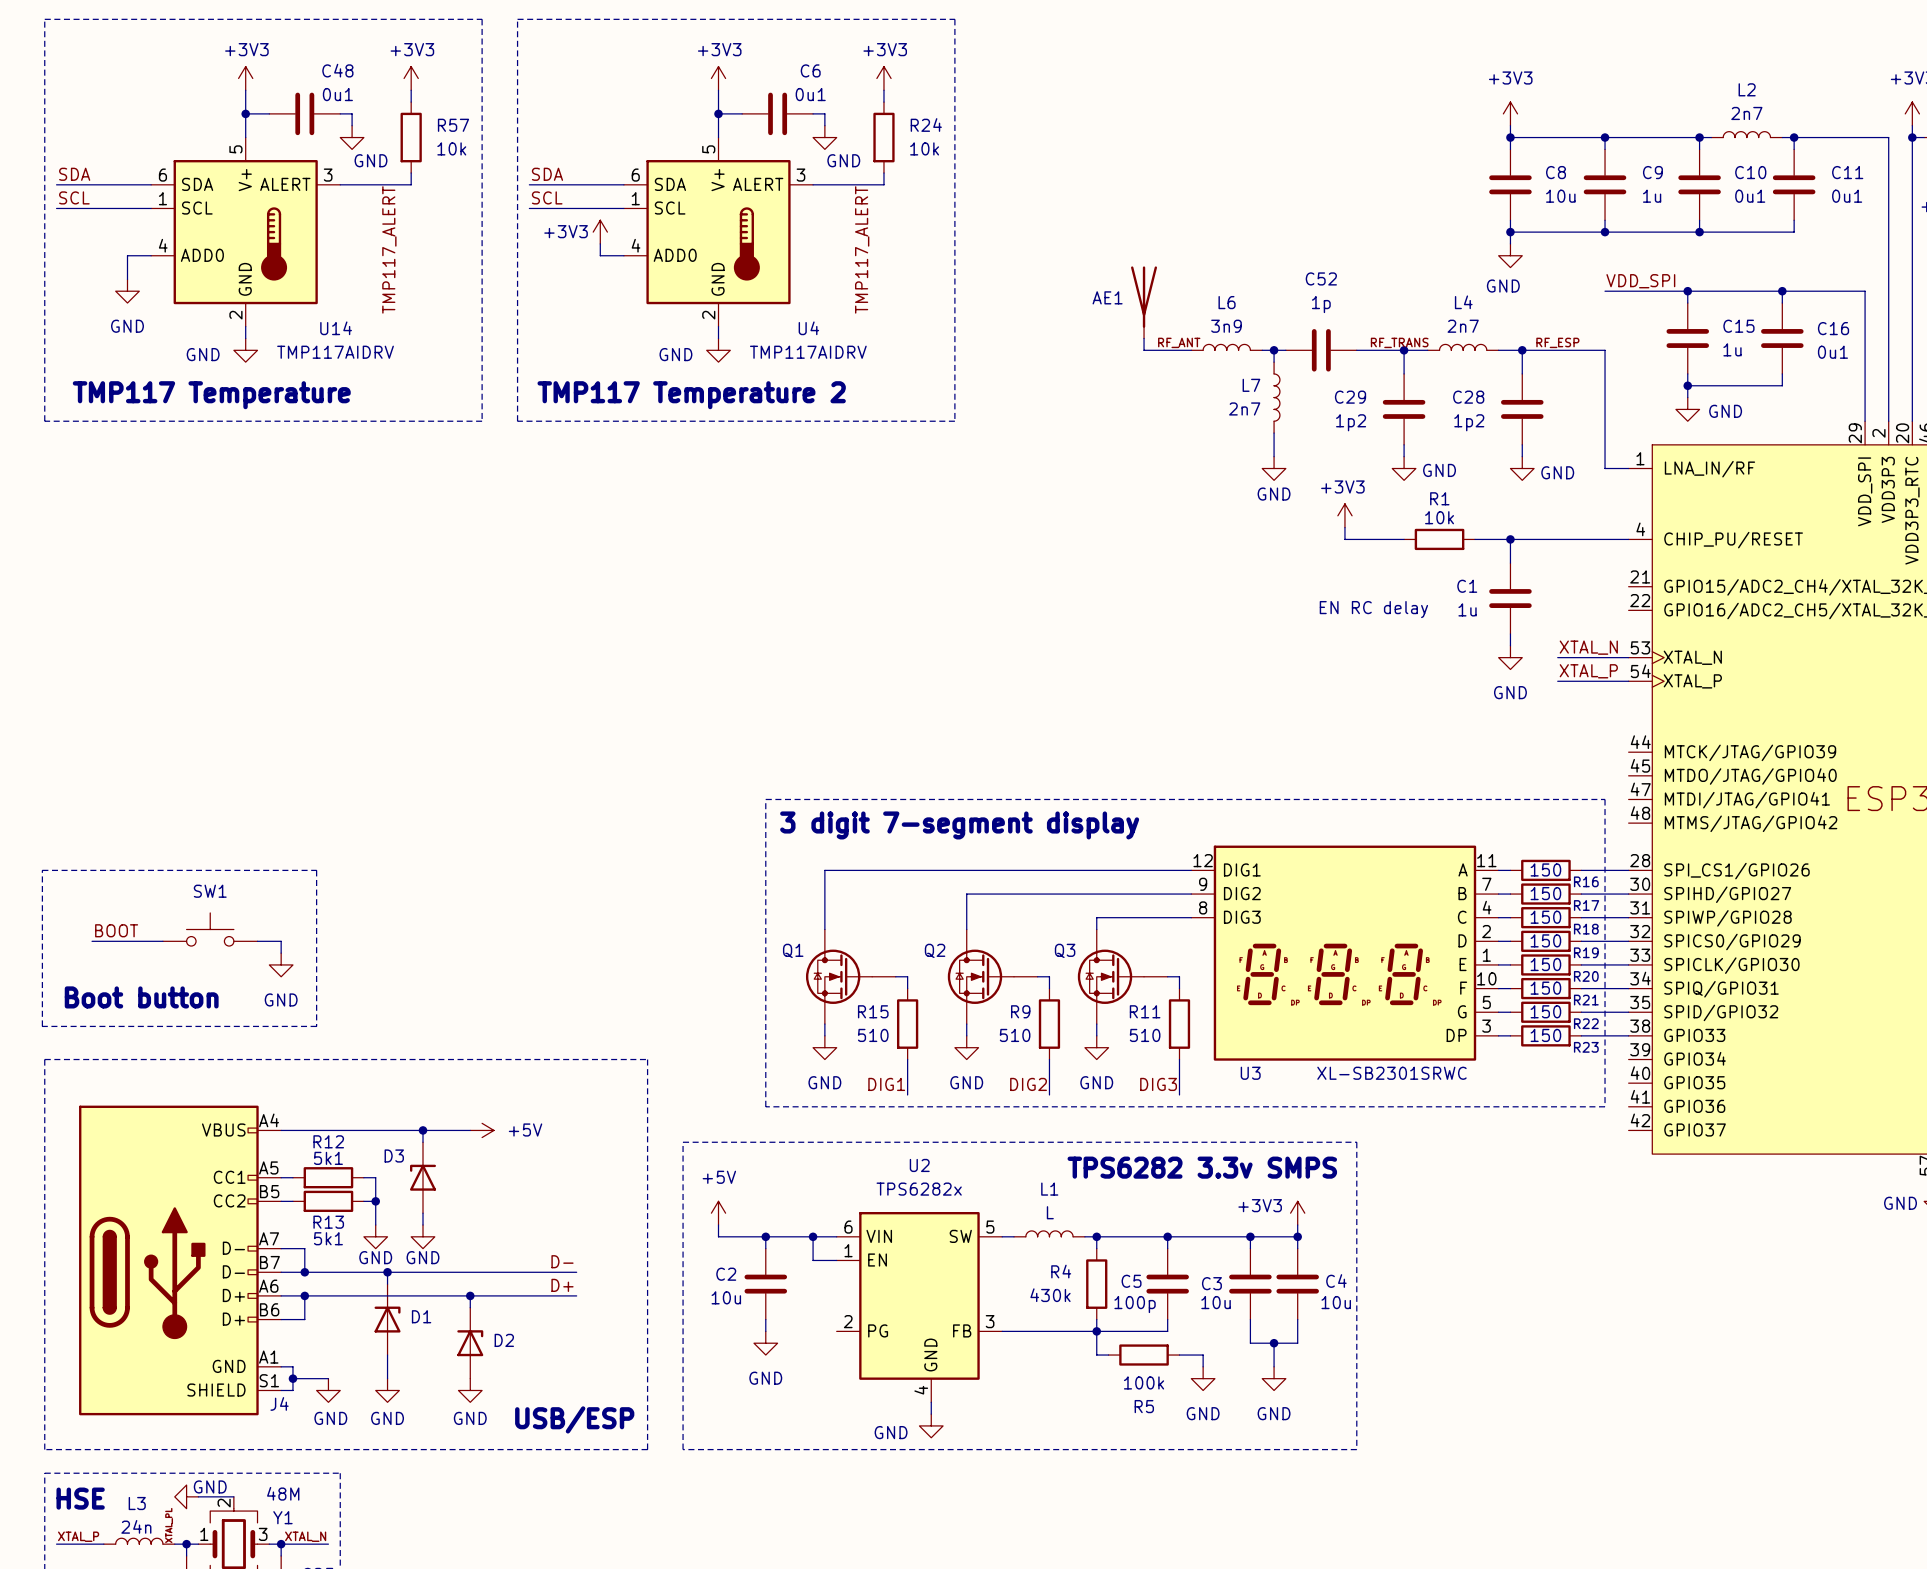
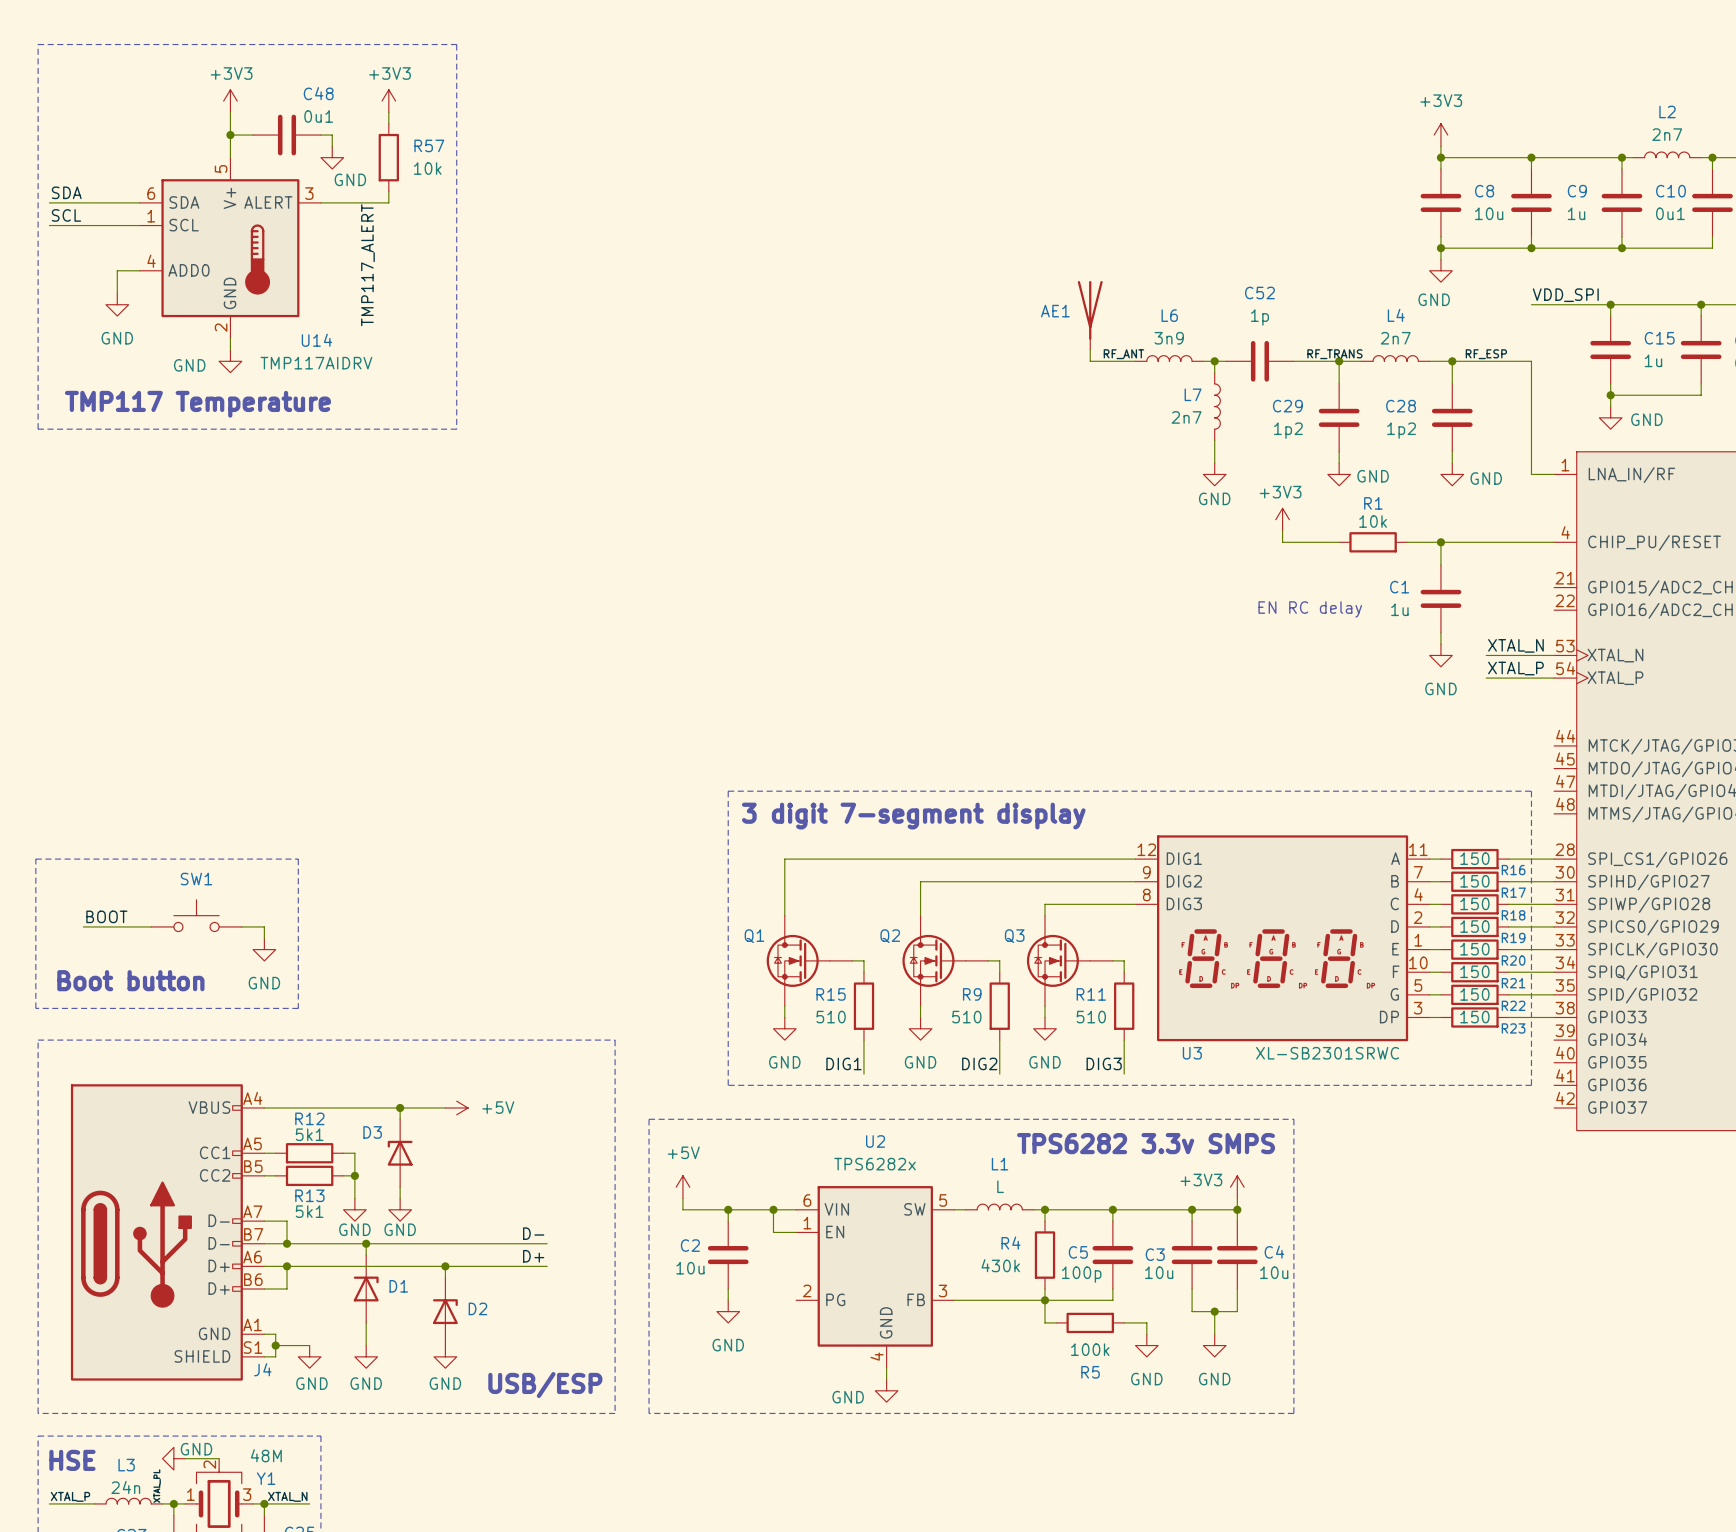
line: (517, 19) (954, 19) (954, 421) (517, 421) (517, 19) -> none
power symbol: +3V3 (718, 78) -> none
power symbol: +3V3 (883, 78) -> none
wire: (718, 90) (718, 137) -> none
wire: (883, 90) (883, 102) -> none
wire: (718, 113) (742, 113) -> none
junction: (718, 113) -> none
C6: 0u1 (777, 113) -> none
wire: (813, 113) (824, 113) (824, 125) -> none
power symbol: GND (824, 137) -> none
R24: 10k (883, 137) -> none
wire: (883, 173) (883, 184) (813, 184) -> none
label: SDA (547, 174) -> none
wire: (529, 184) (623, 184) -> none
label: SCL (547, 197) -> none
wire: (529, 208) (623, 208) -> none
power symbol: +3V3 (600, 232) -> none
U4: TMP117AIDRV (718, 232) -> none
wire: (600, 243) (600, 255) (623, 255) -> none
label: TMP117_ALERT (862, 249) -> none
wire: (718, 326) (718, 338) -> none
power symbol: GND (718, 350) -> none
text: TMP117 Temperature 2 (691, 395) -> none

